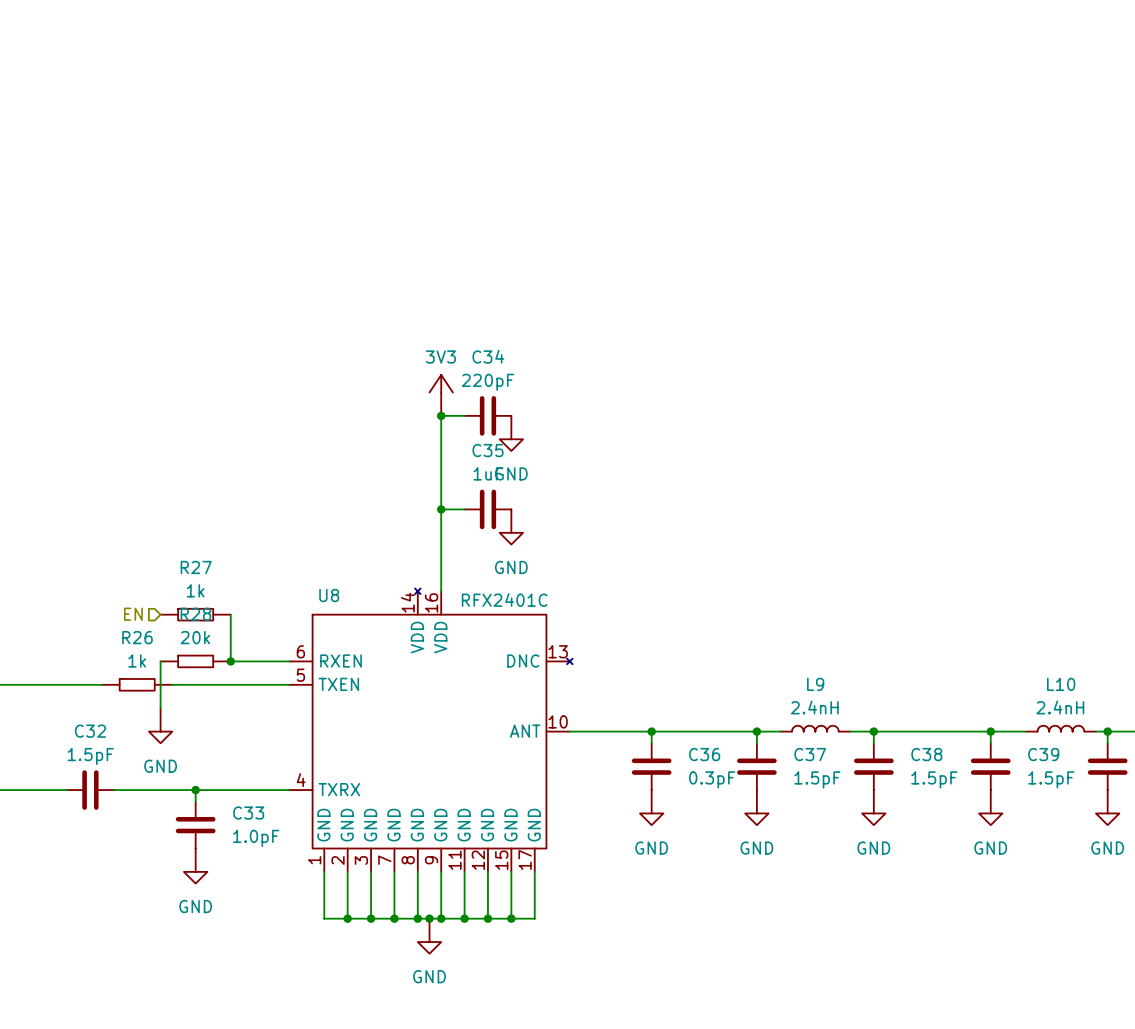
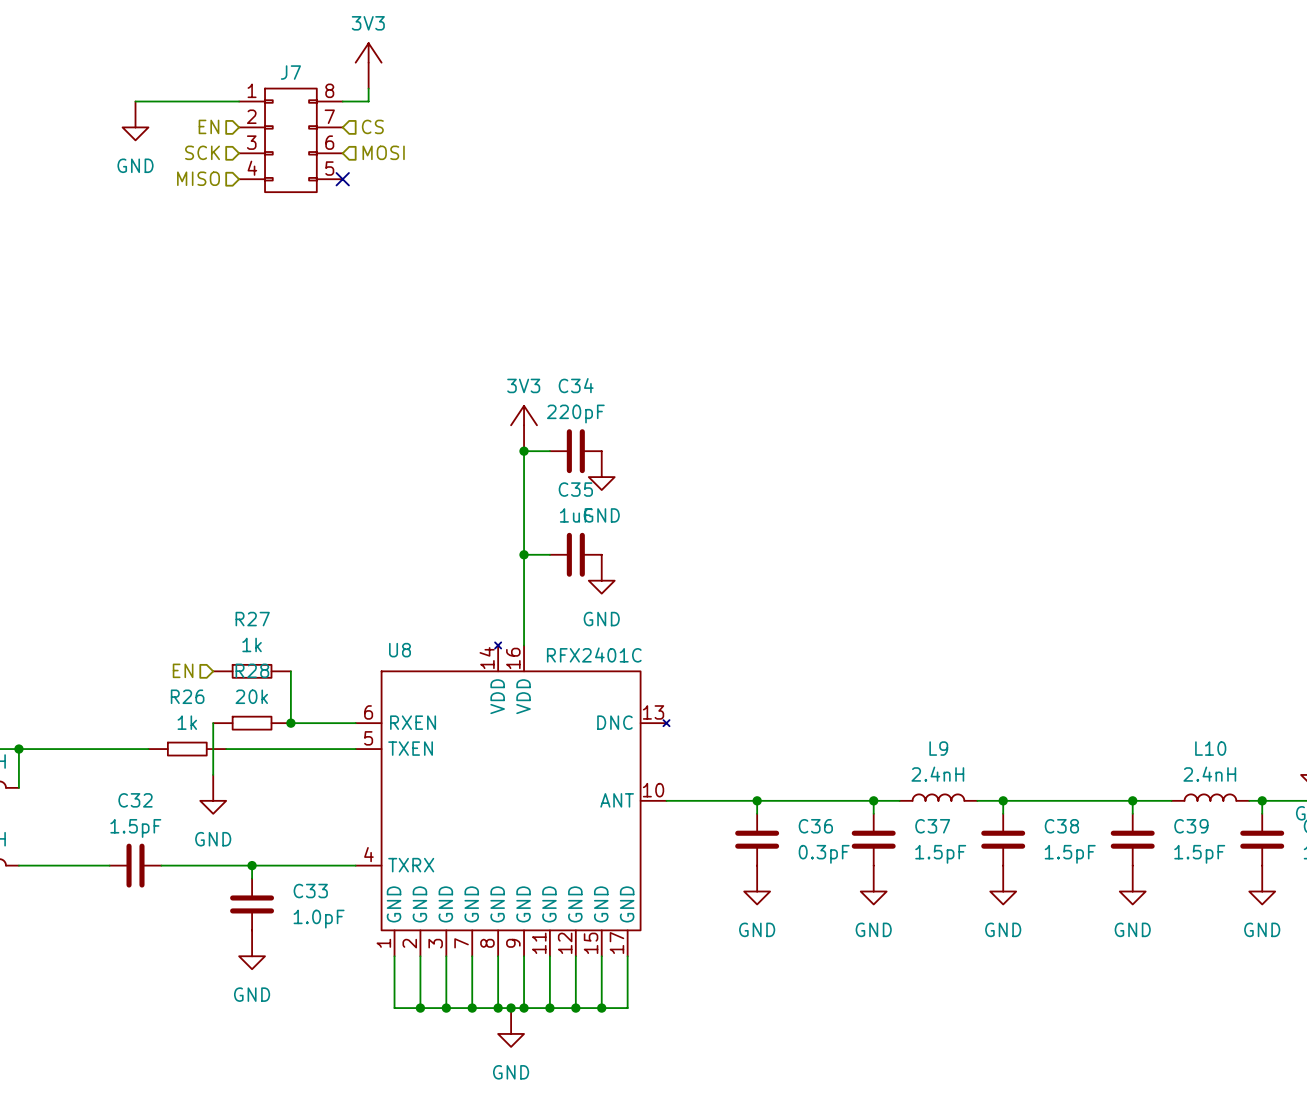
power symbol: none -> 3V3 (368, 65)
wire: none -> (368, 88) (368, 101) (342, 101)
wire: none -> (135, 101) (239, 101)
power symbol: none -> GND (135, 120)
hierarchical label: none -> EN (209, 126)
hierarchical label: none -> CS (372, 126)
J7: none -> (290, 140)
hierarchical label: none -> SCK (202, 152)
hierarchical label: none -> MOSI (383, 152)
hierarchical label: none -> MISO (198, 178)
no-connect mark: none -> (342, 179)

